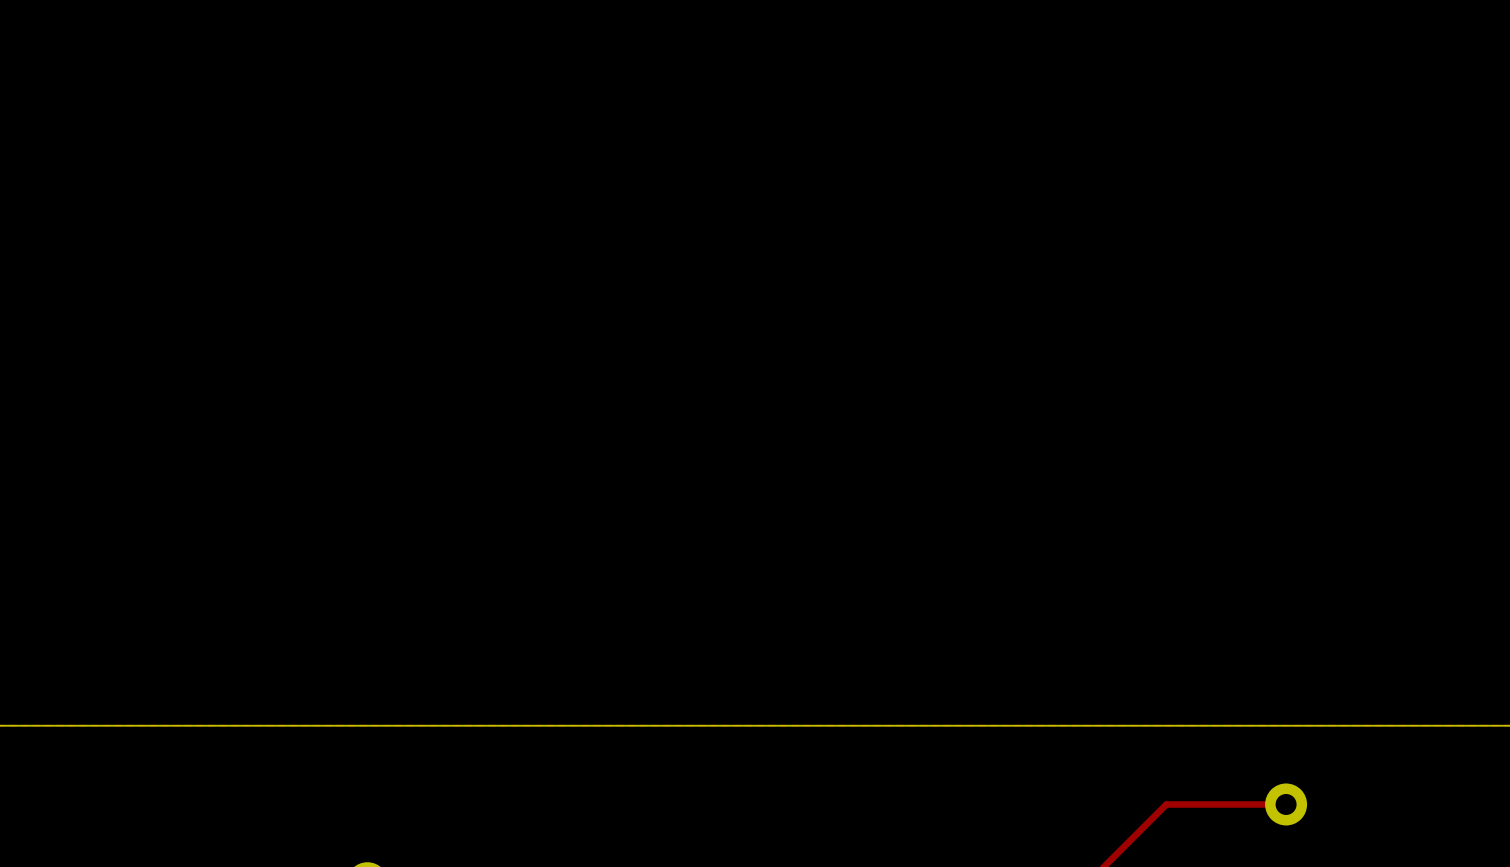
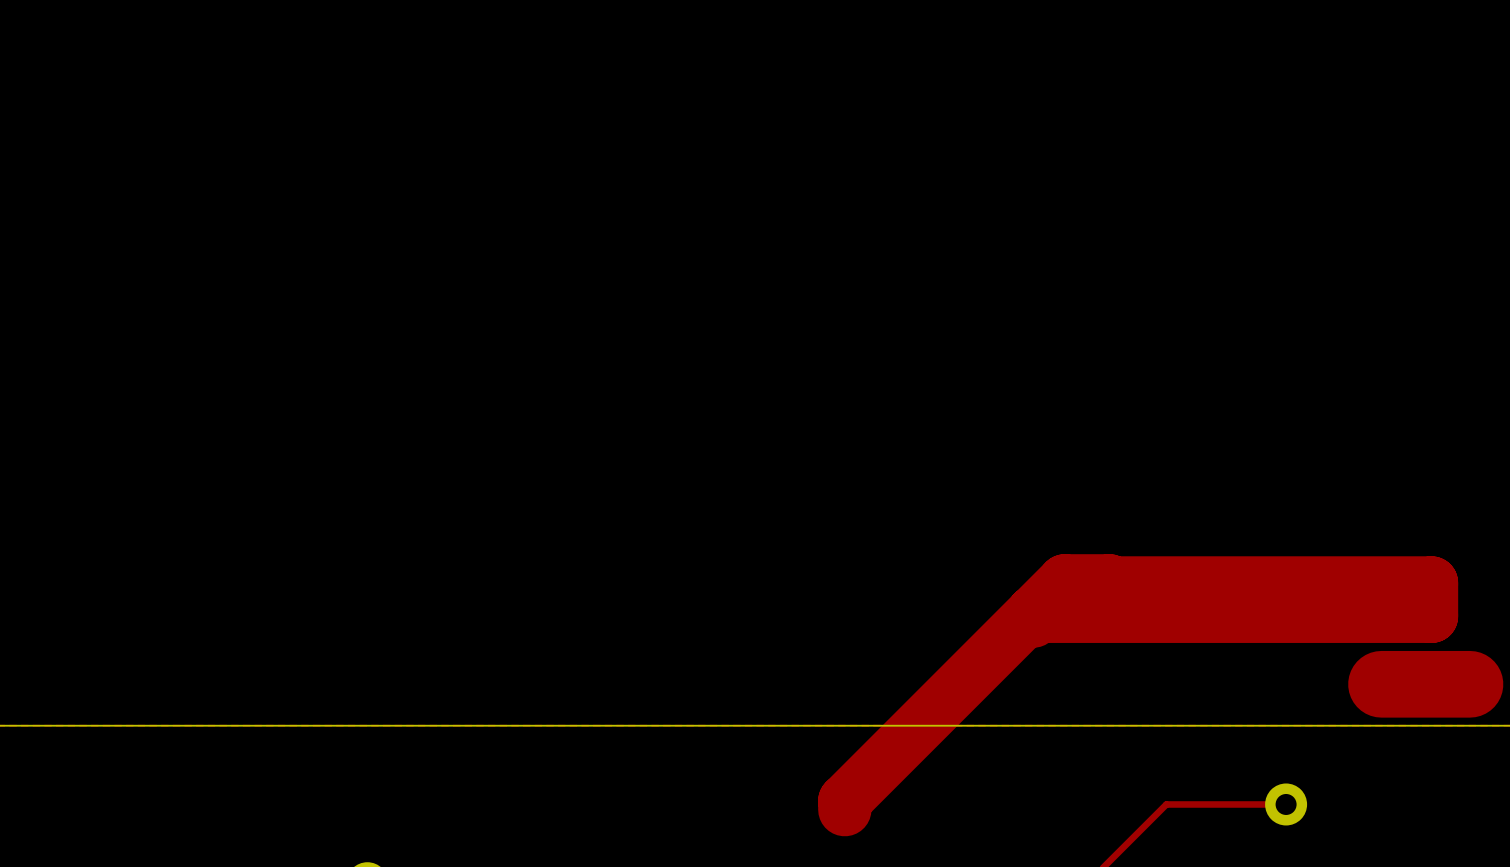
top track: none -> (1033, 621) (1033, 612) (1037, 616) (1431, 616) (1431, 582) (1111, 582) (1109, 580) (1064, 580) (844, 800) (844, 809)
top track: none -> (1469, 684) (1381, 684)

